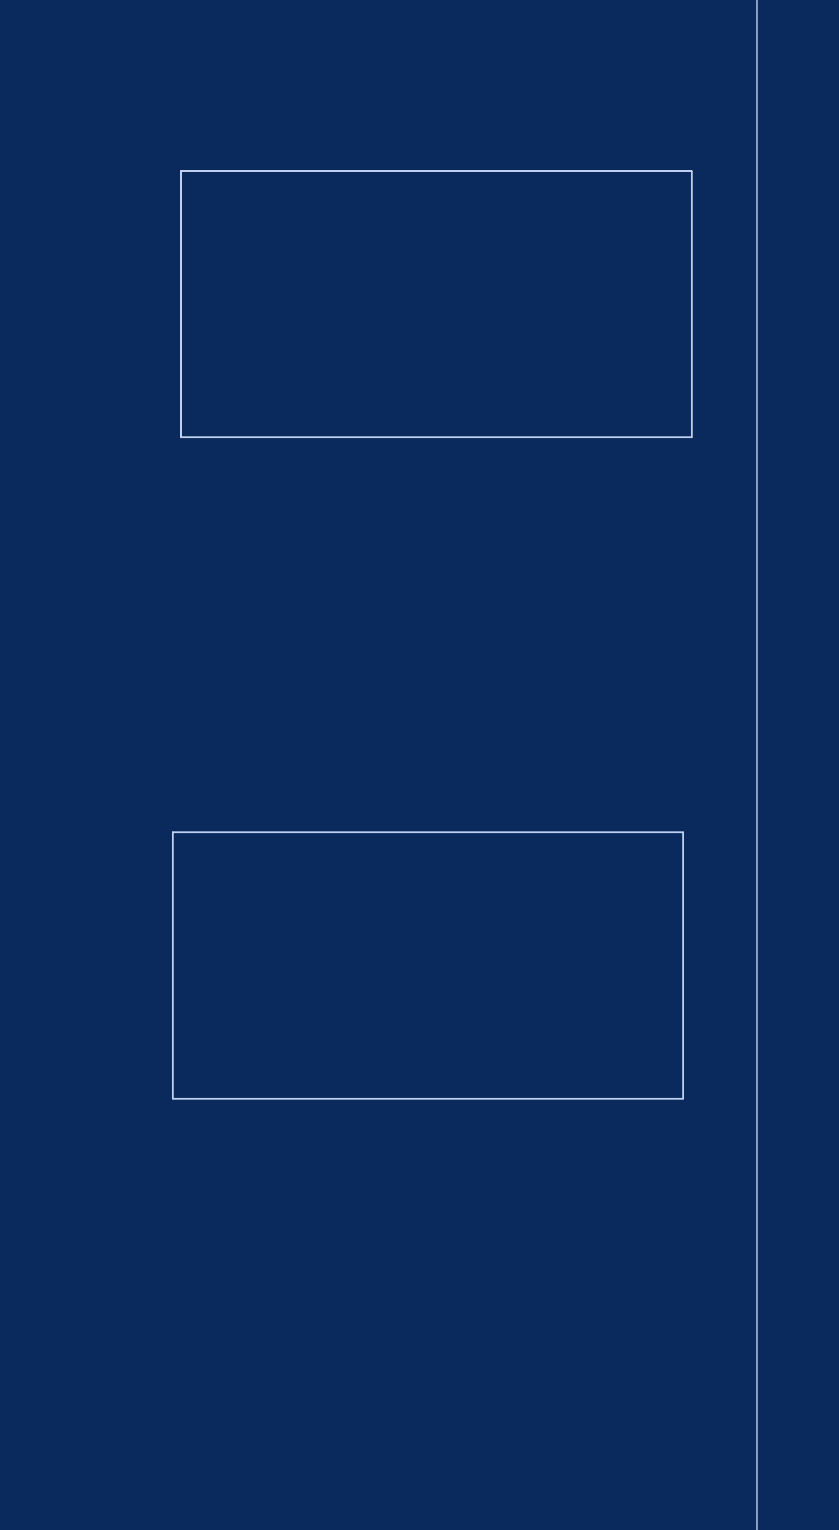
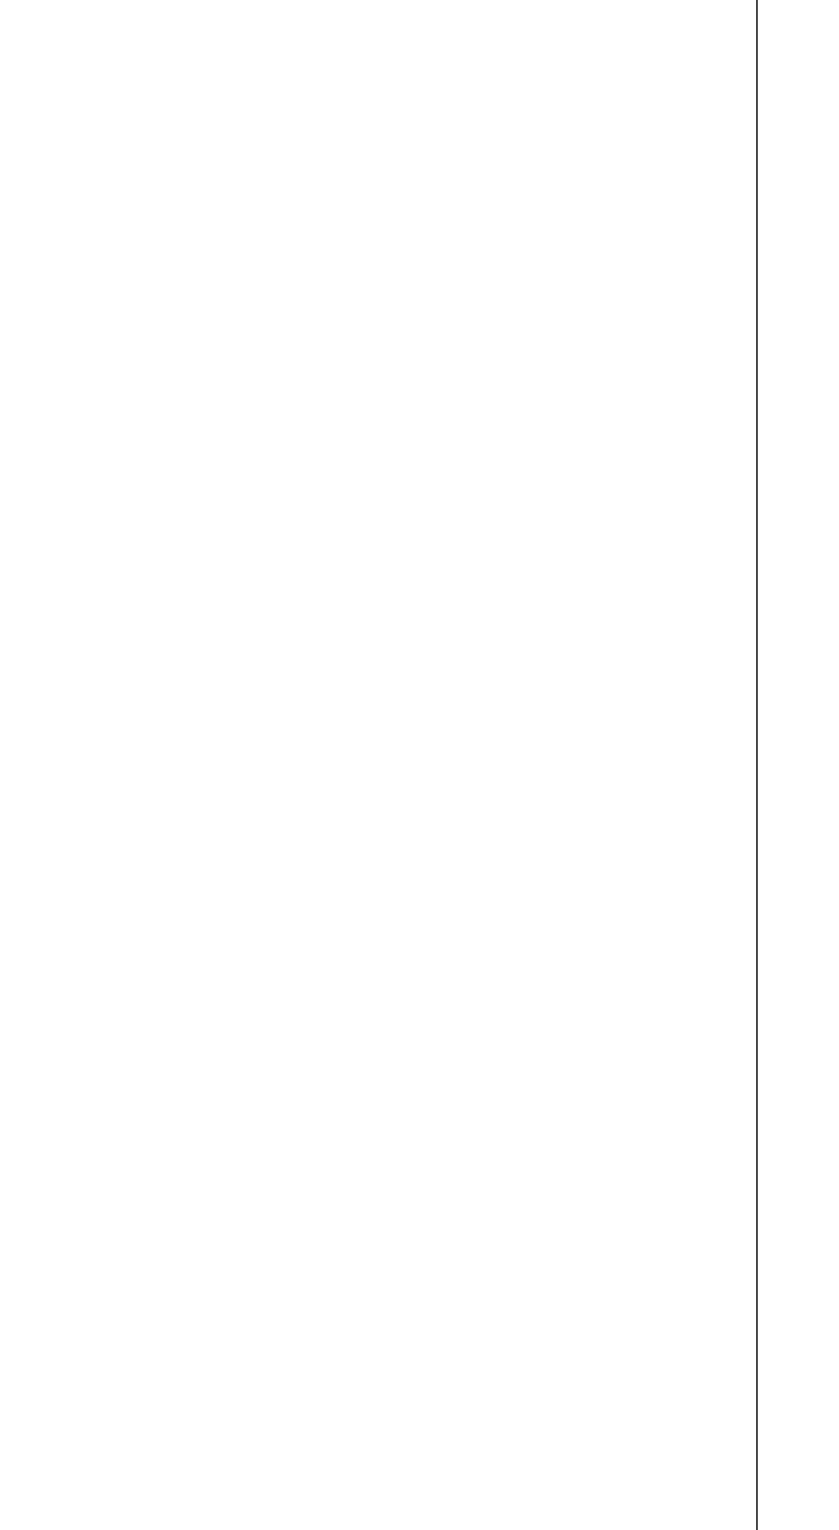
part: (436, 304) -> none
part: (427, 965) -> none

